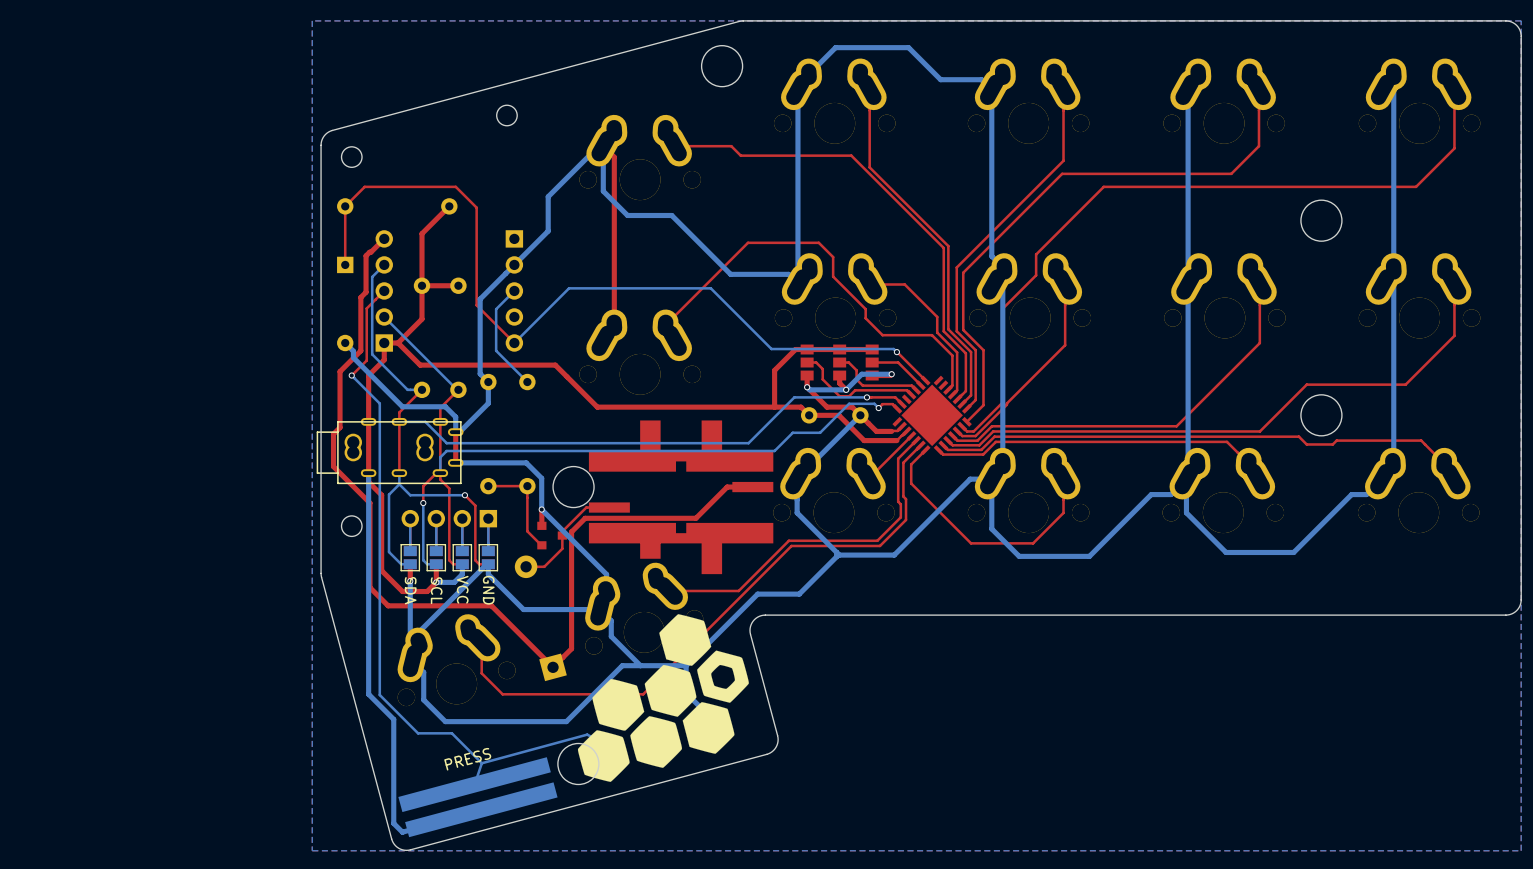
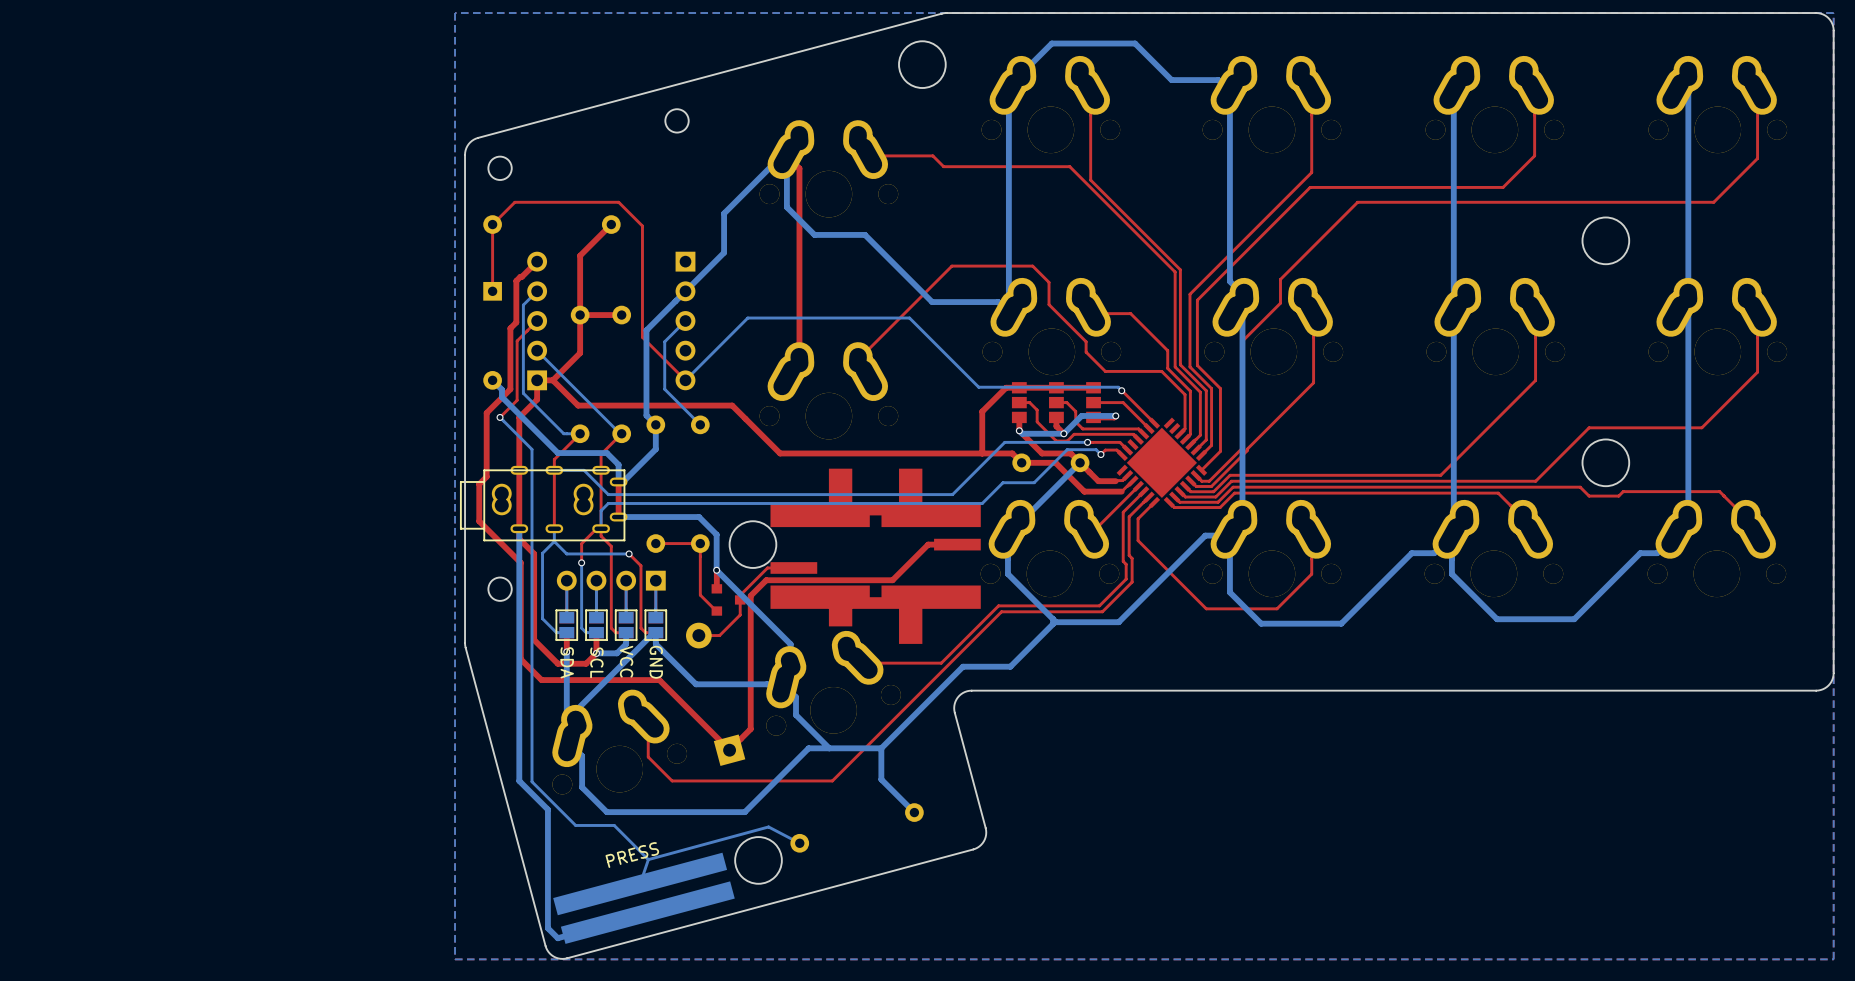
drawing: [577, 614, 749, 782] -> none

